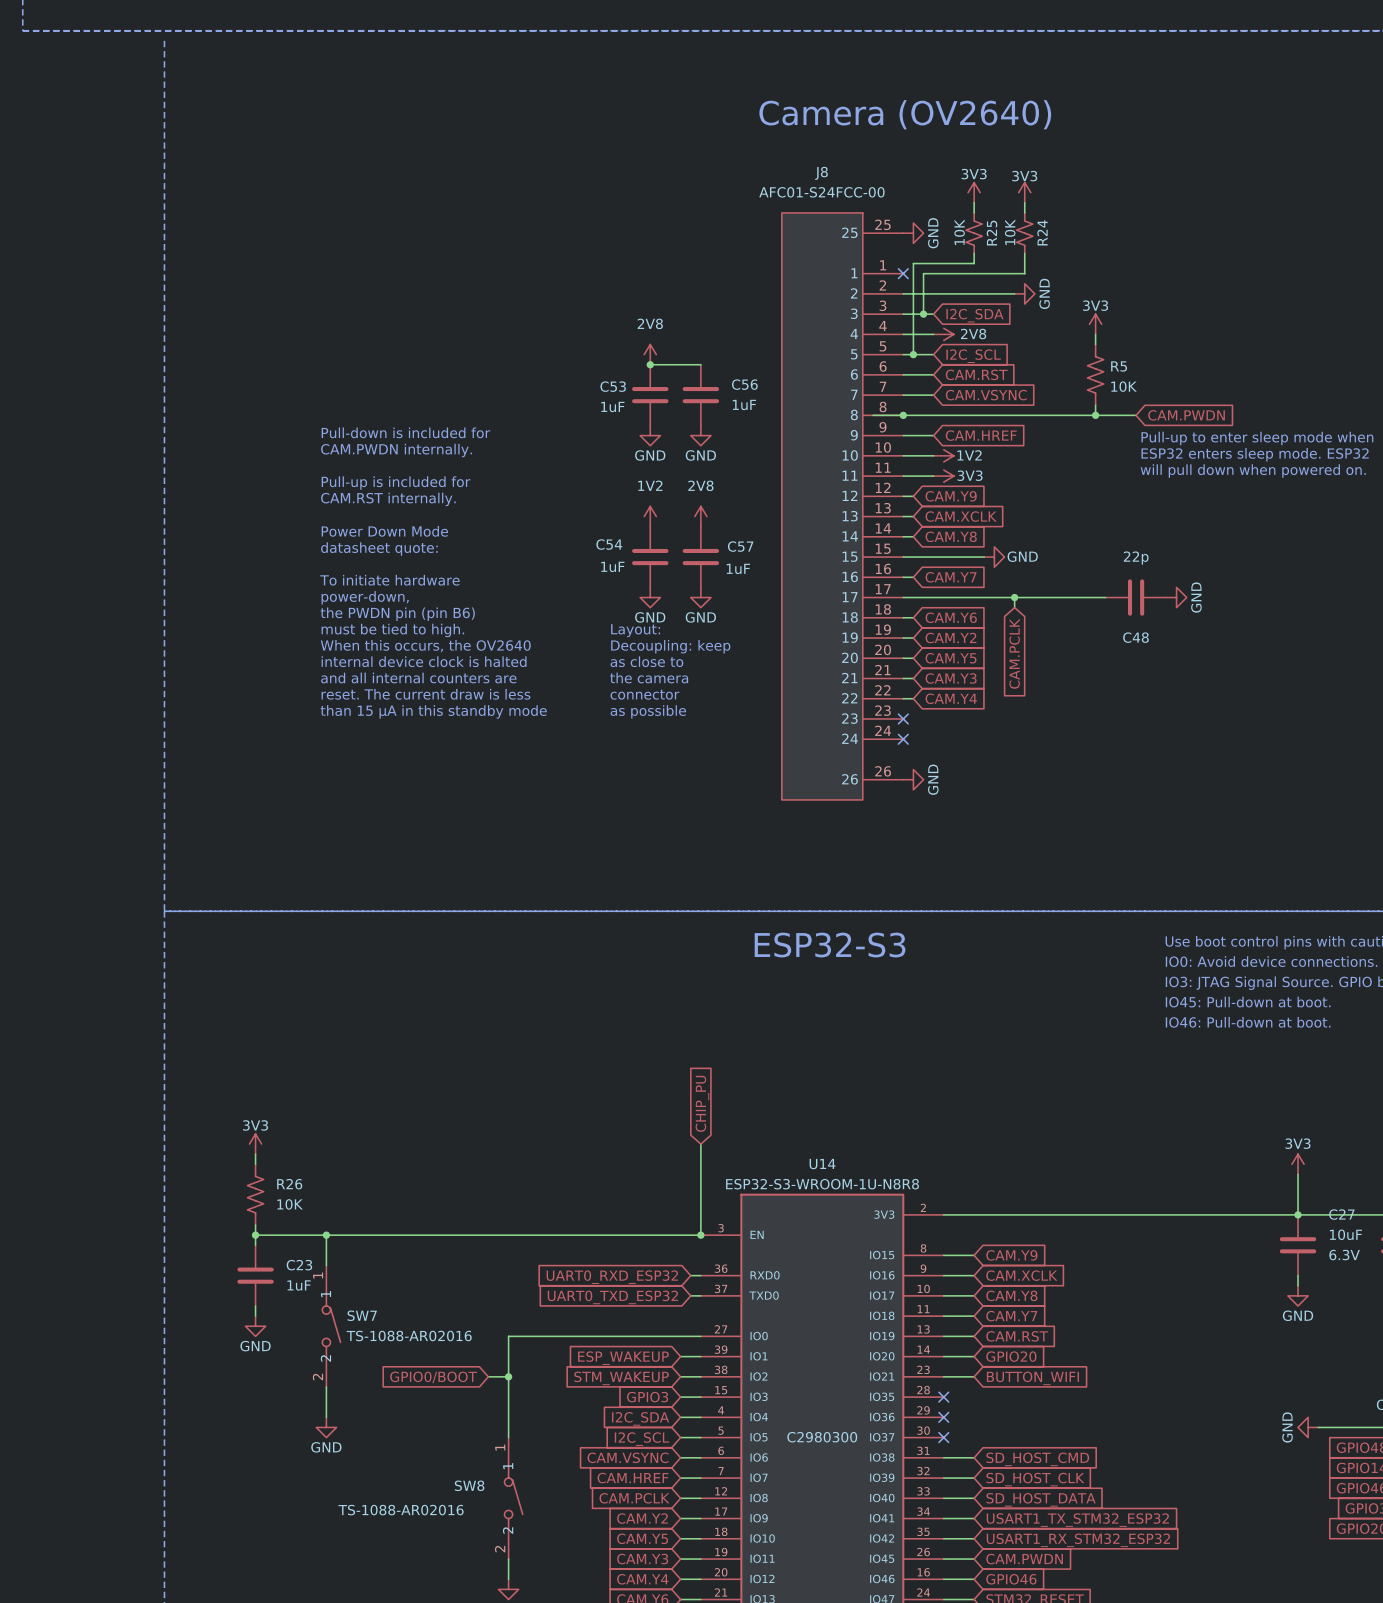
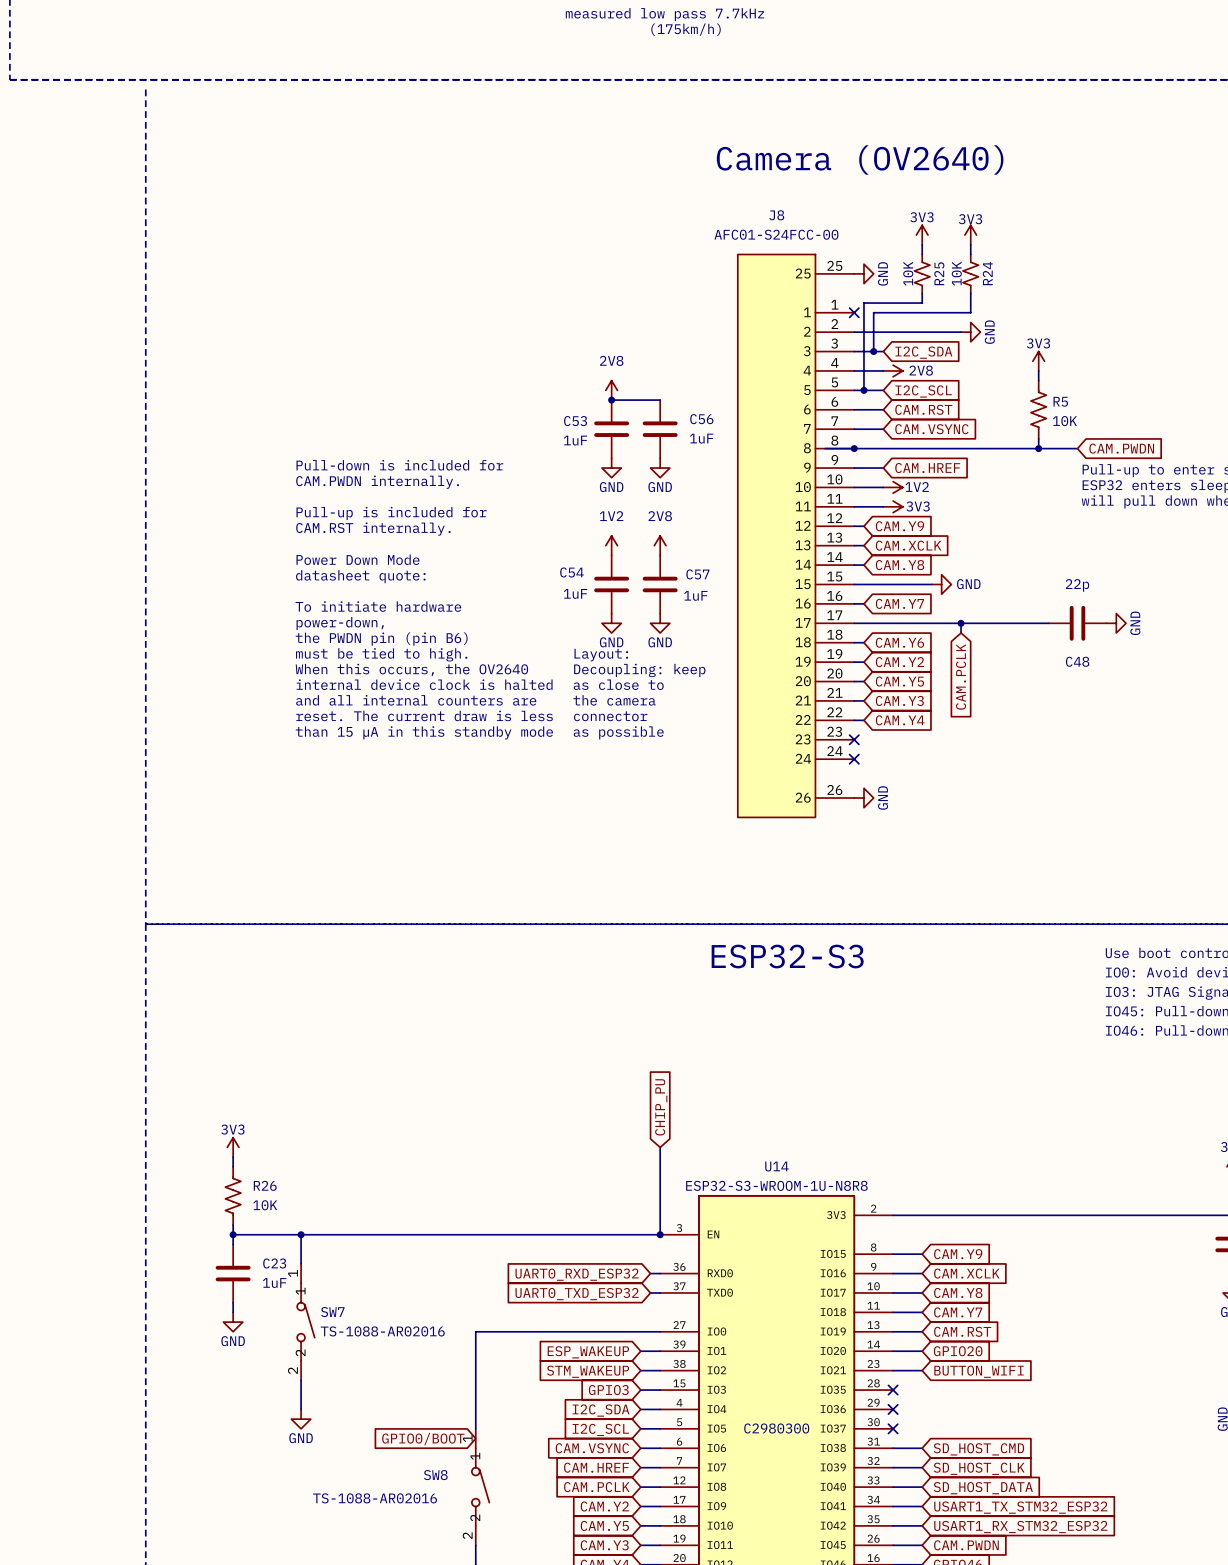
wire: (488, 1376) (508, 1376) -> none
junction: (508, 1376) -> none
global label position: GPIO0/BOOT (433, 1377) -> GPIO0/BOOT (423, 1439)

